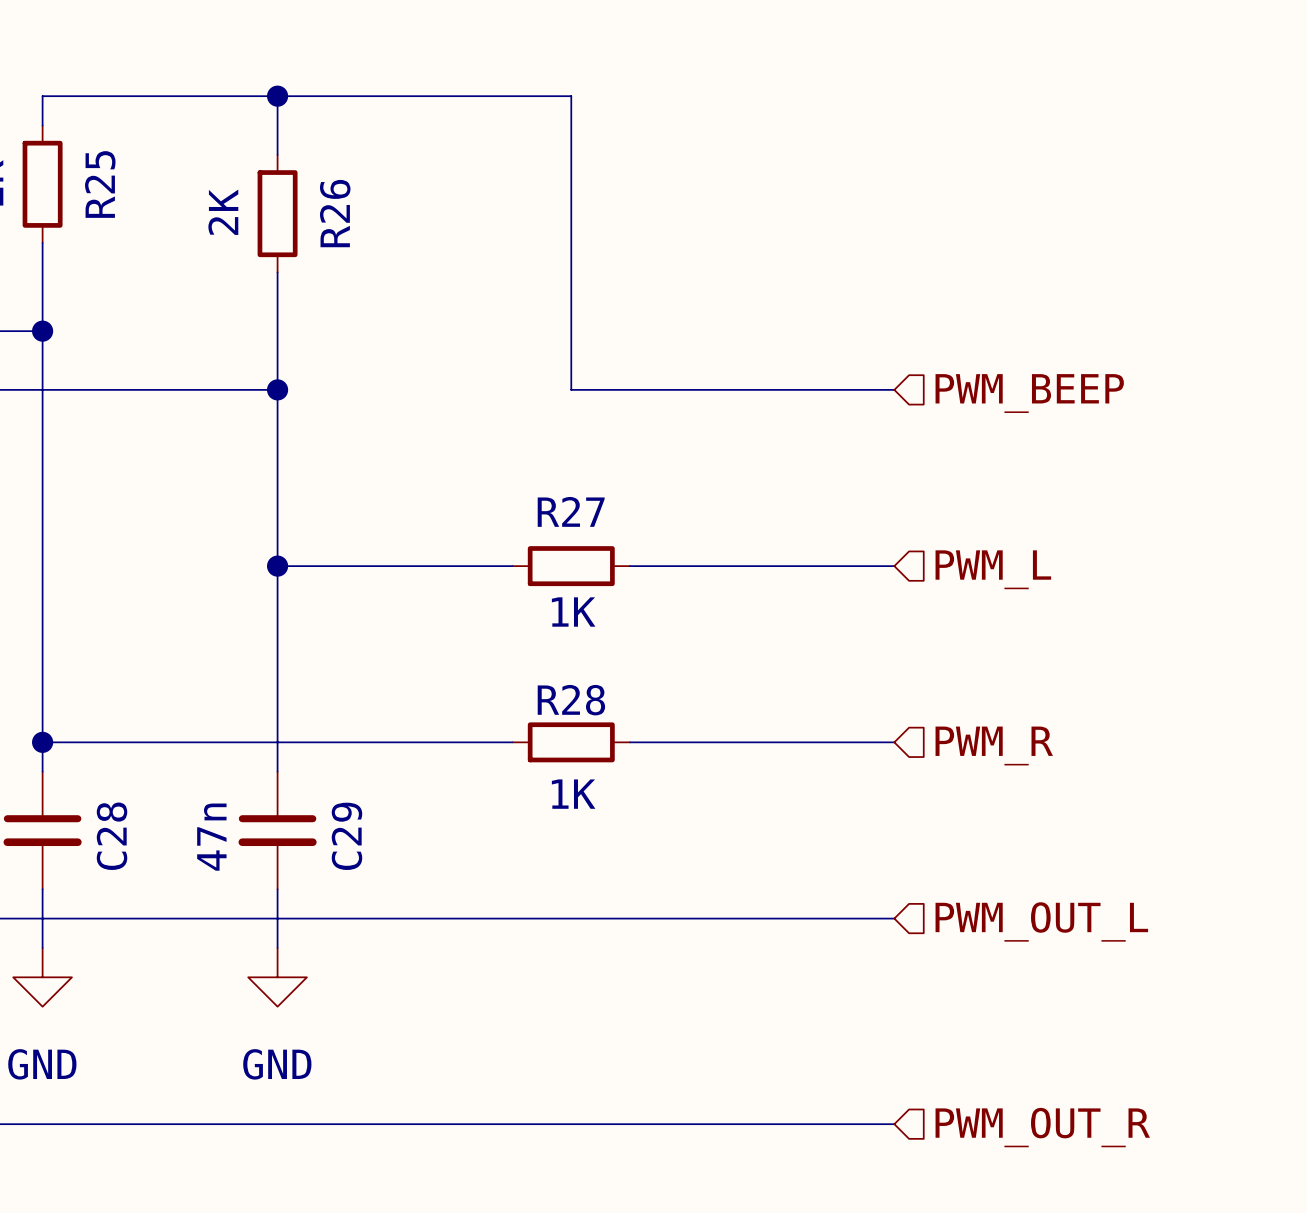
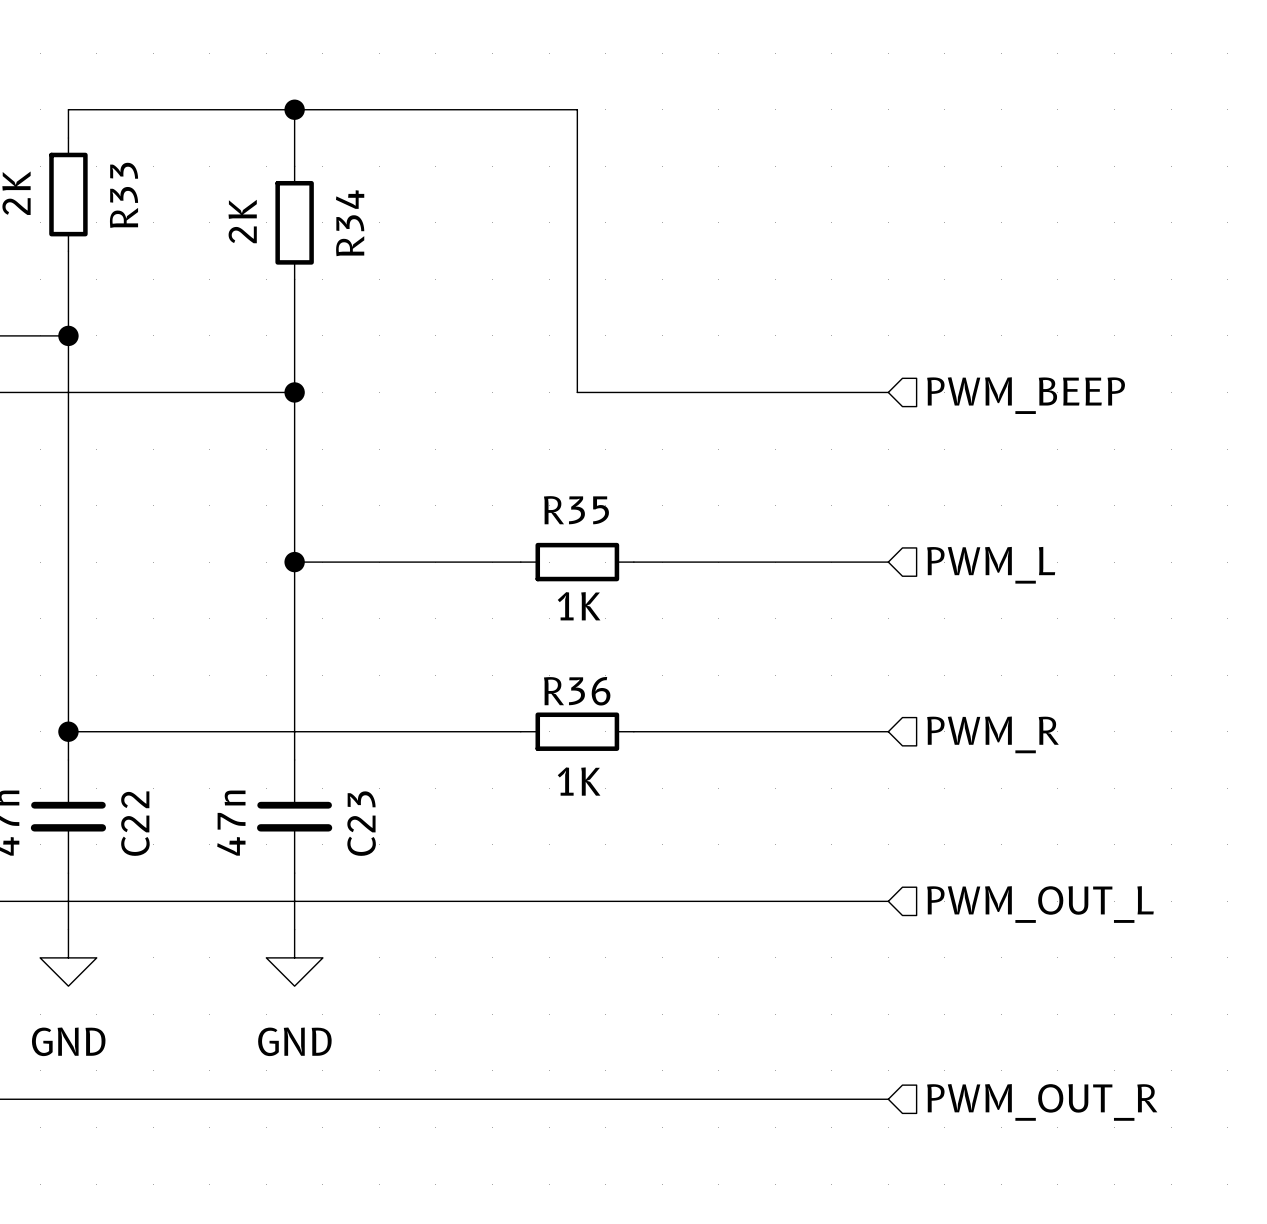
R25 name: R25 (100, 184) -> R33 (124, 195)
R26 name: R26 (335, 213) -> R34 (350, 223)
R27 name: R27 (571, 511) -> R35 (576, 510)
R28 name: R28 (571, 700) -> R36 (577, 691)
C28 name: C28 (112, 836) -> C22 (135, 823)
C29 name: C29 (346, 836) -> C23 (361, 823)

